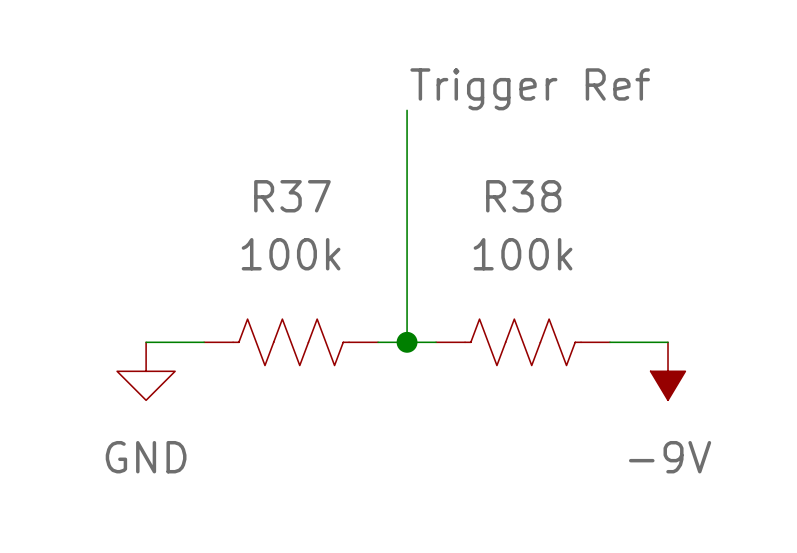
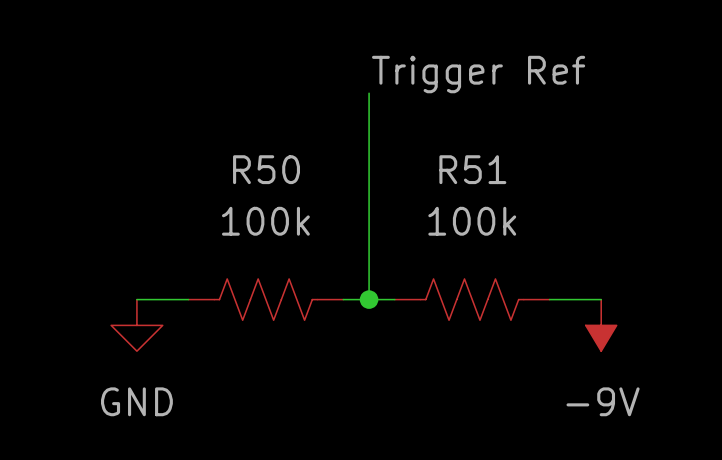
R37 name: R37 (292, 196) -> R50 (266, 169)
R38 name: R38 (523, 196) -> R51 (472, 169)

